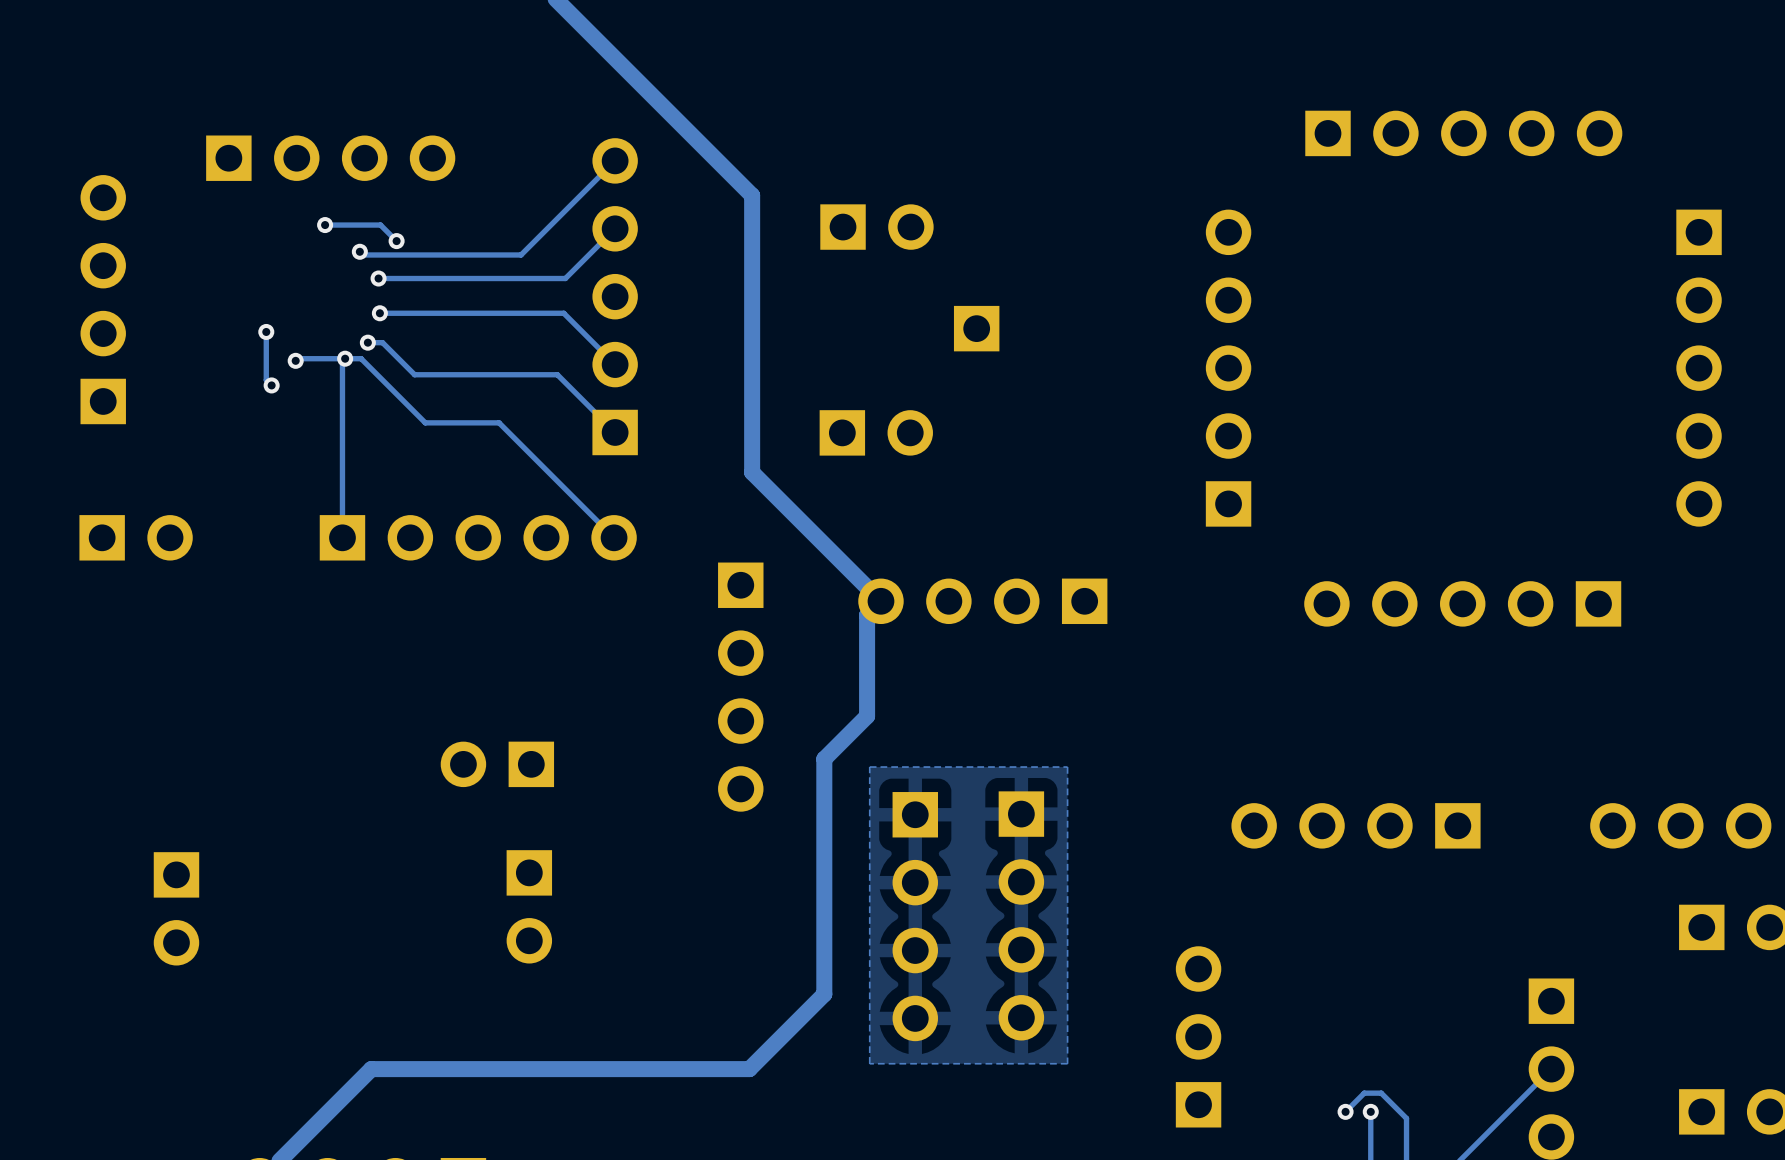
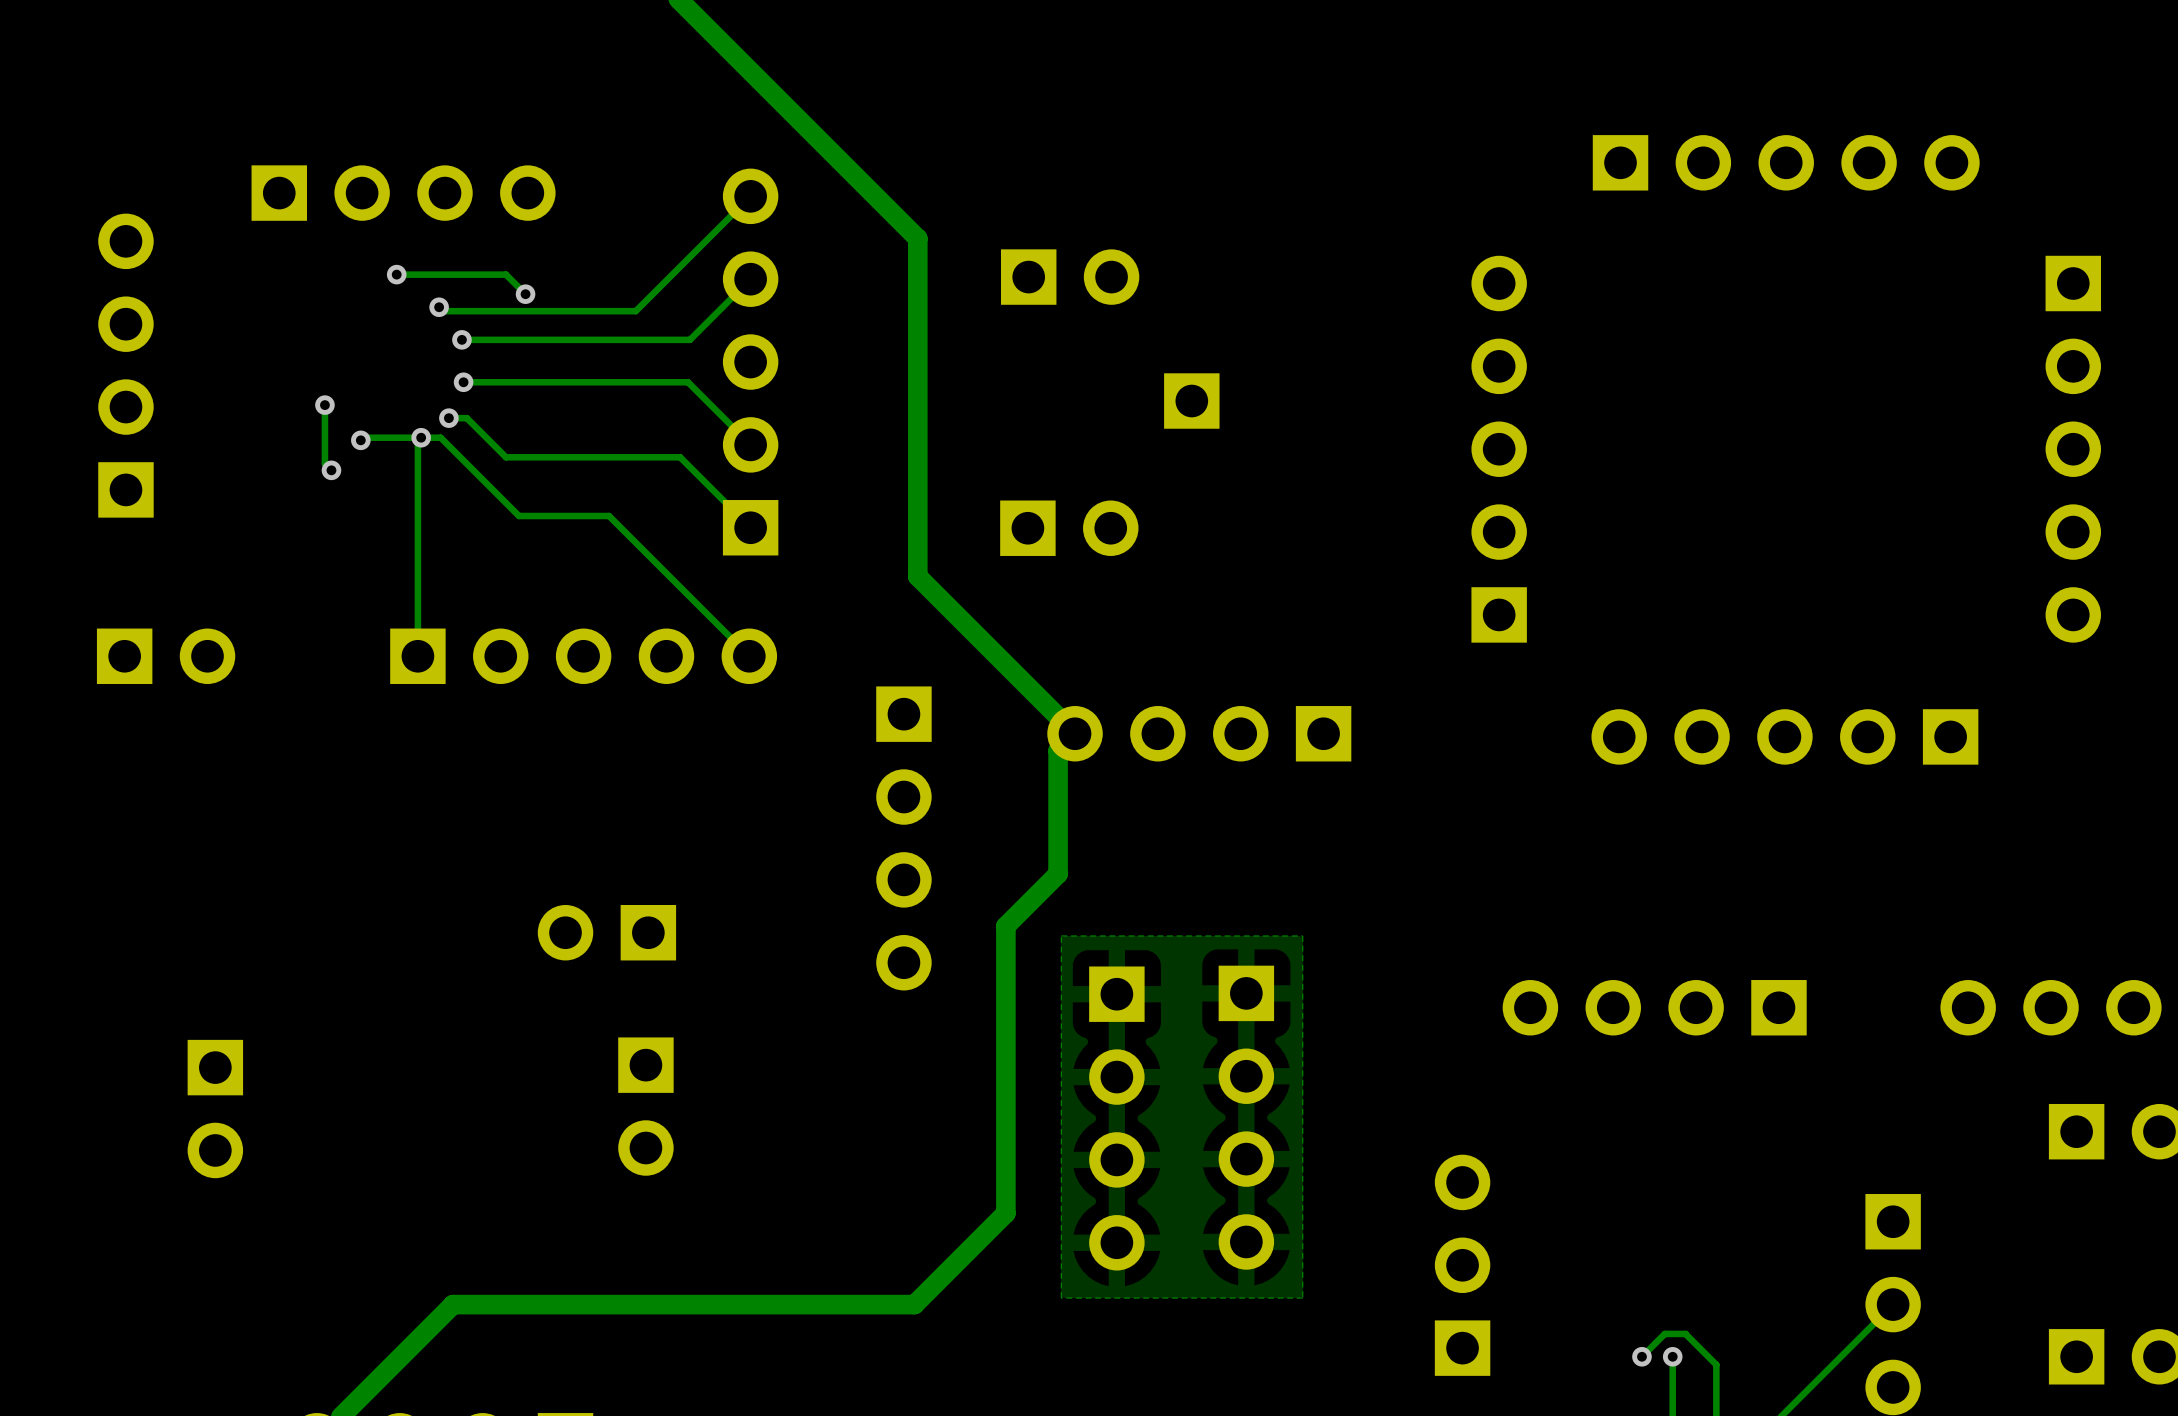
track: (380, 225) (396, 241) -> (464, 274) (505, 274) (525, 294)
via position: (396, 241) -> (525, 294)

